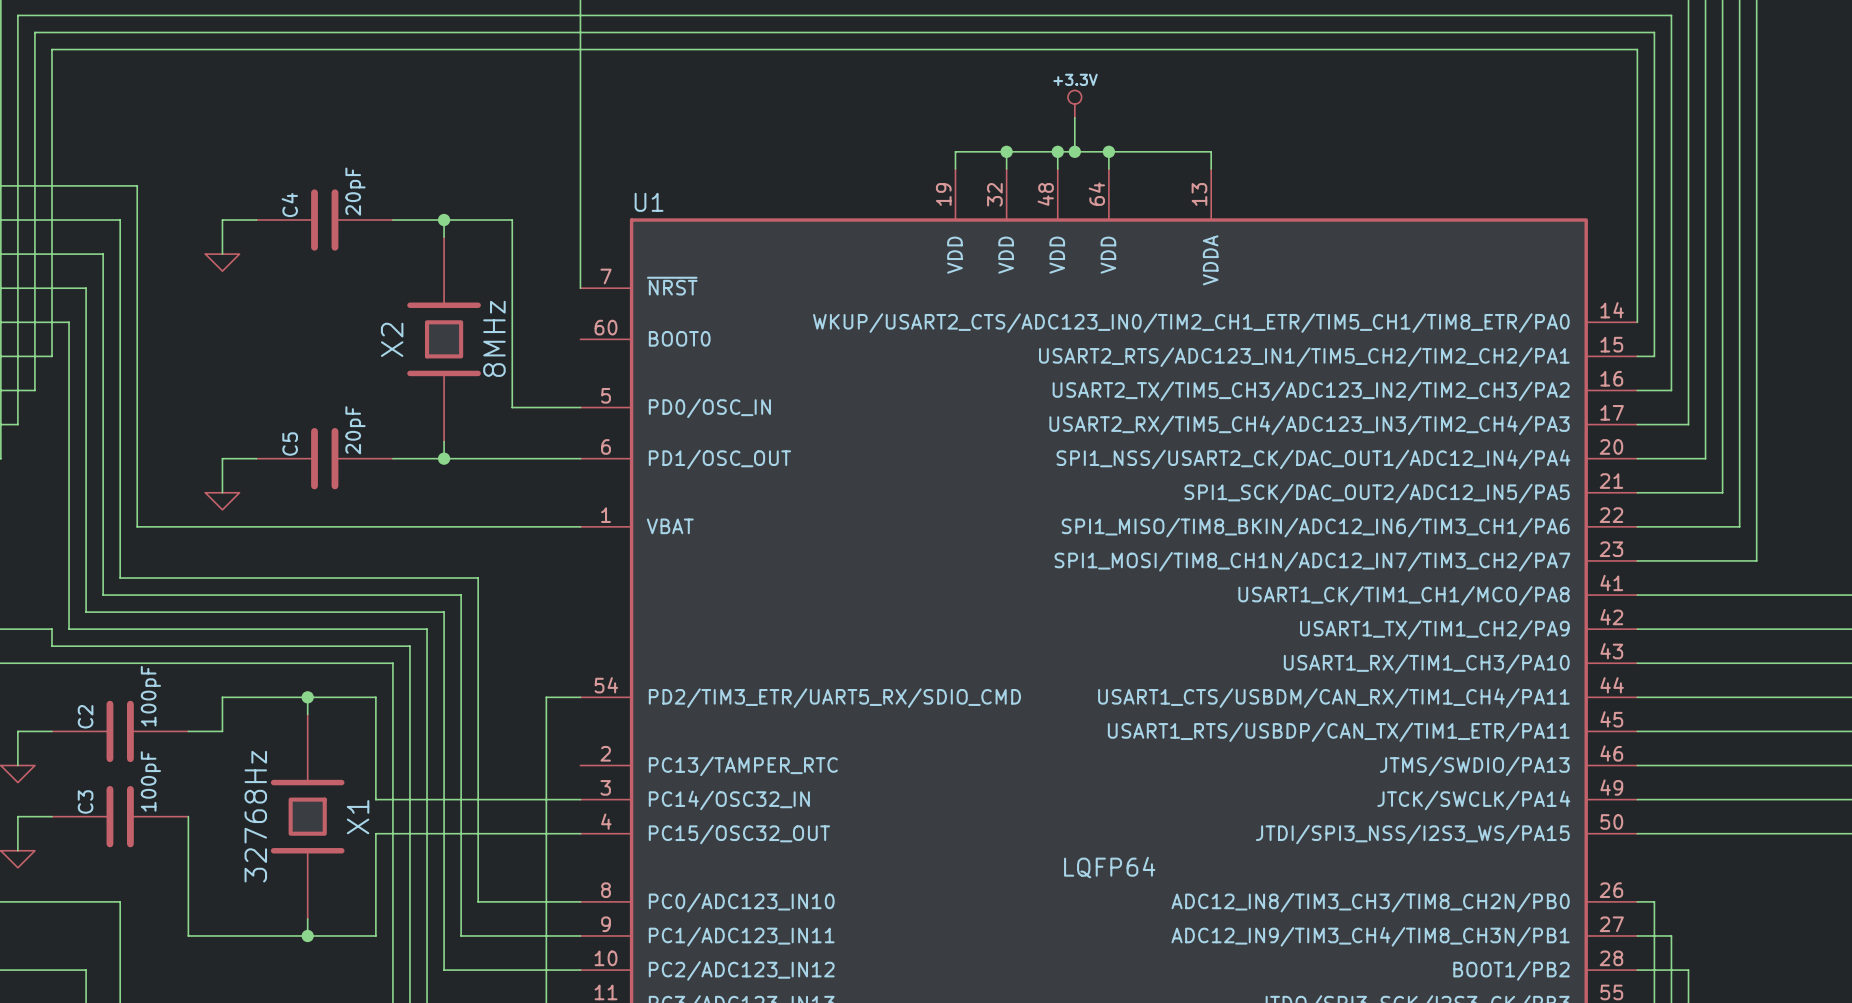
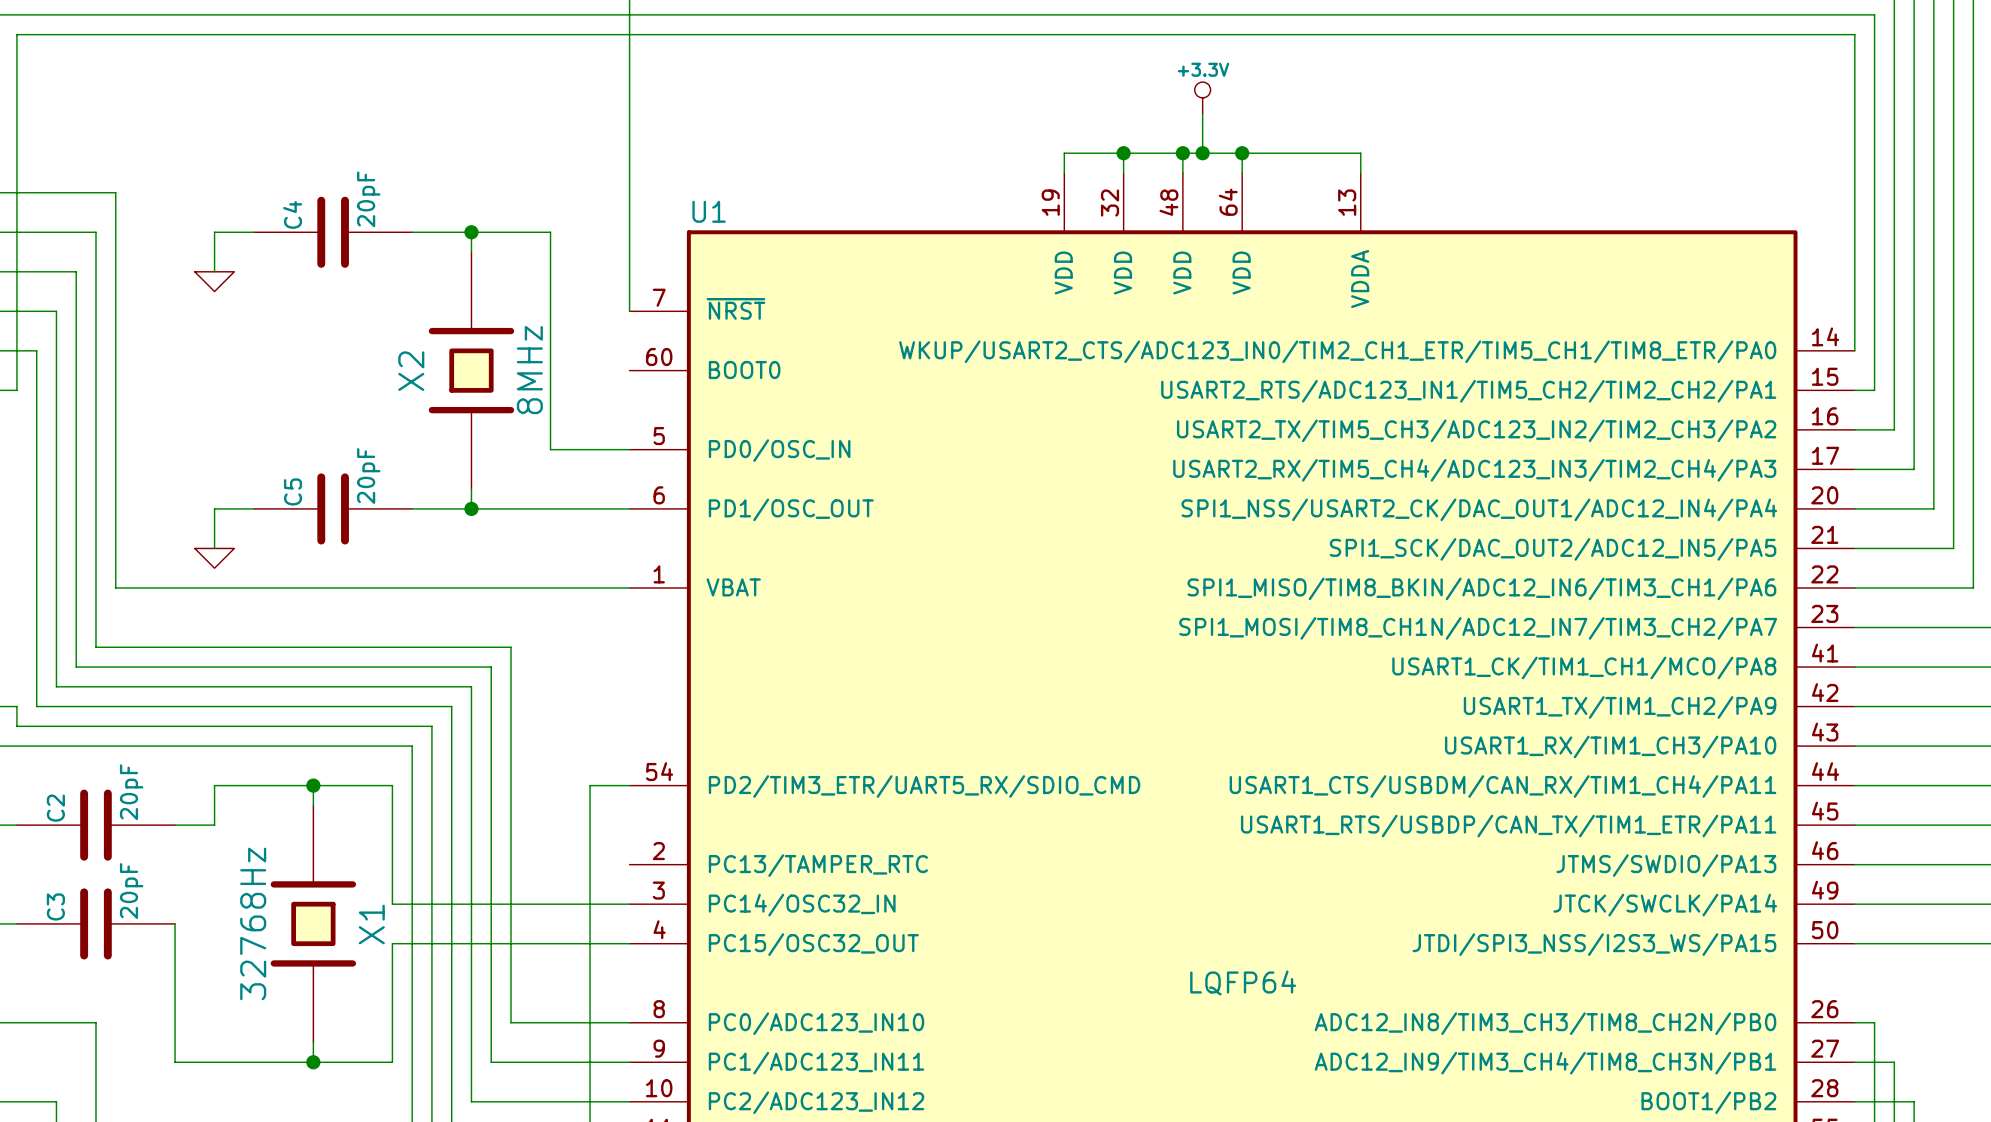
C2 value: 100pF (150, 696) -> 20pF (131, 792)
C3 value: 100pF (150, 781) -> 20pF (131, 891)

